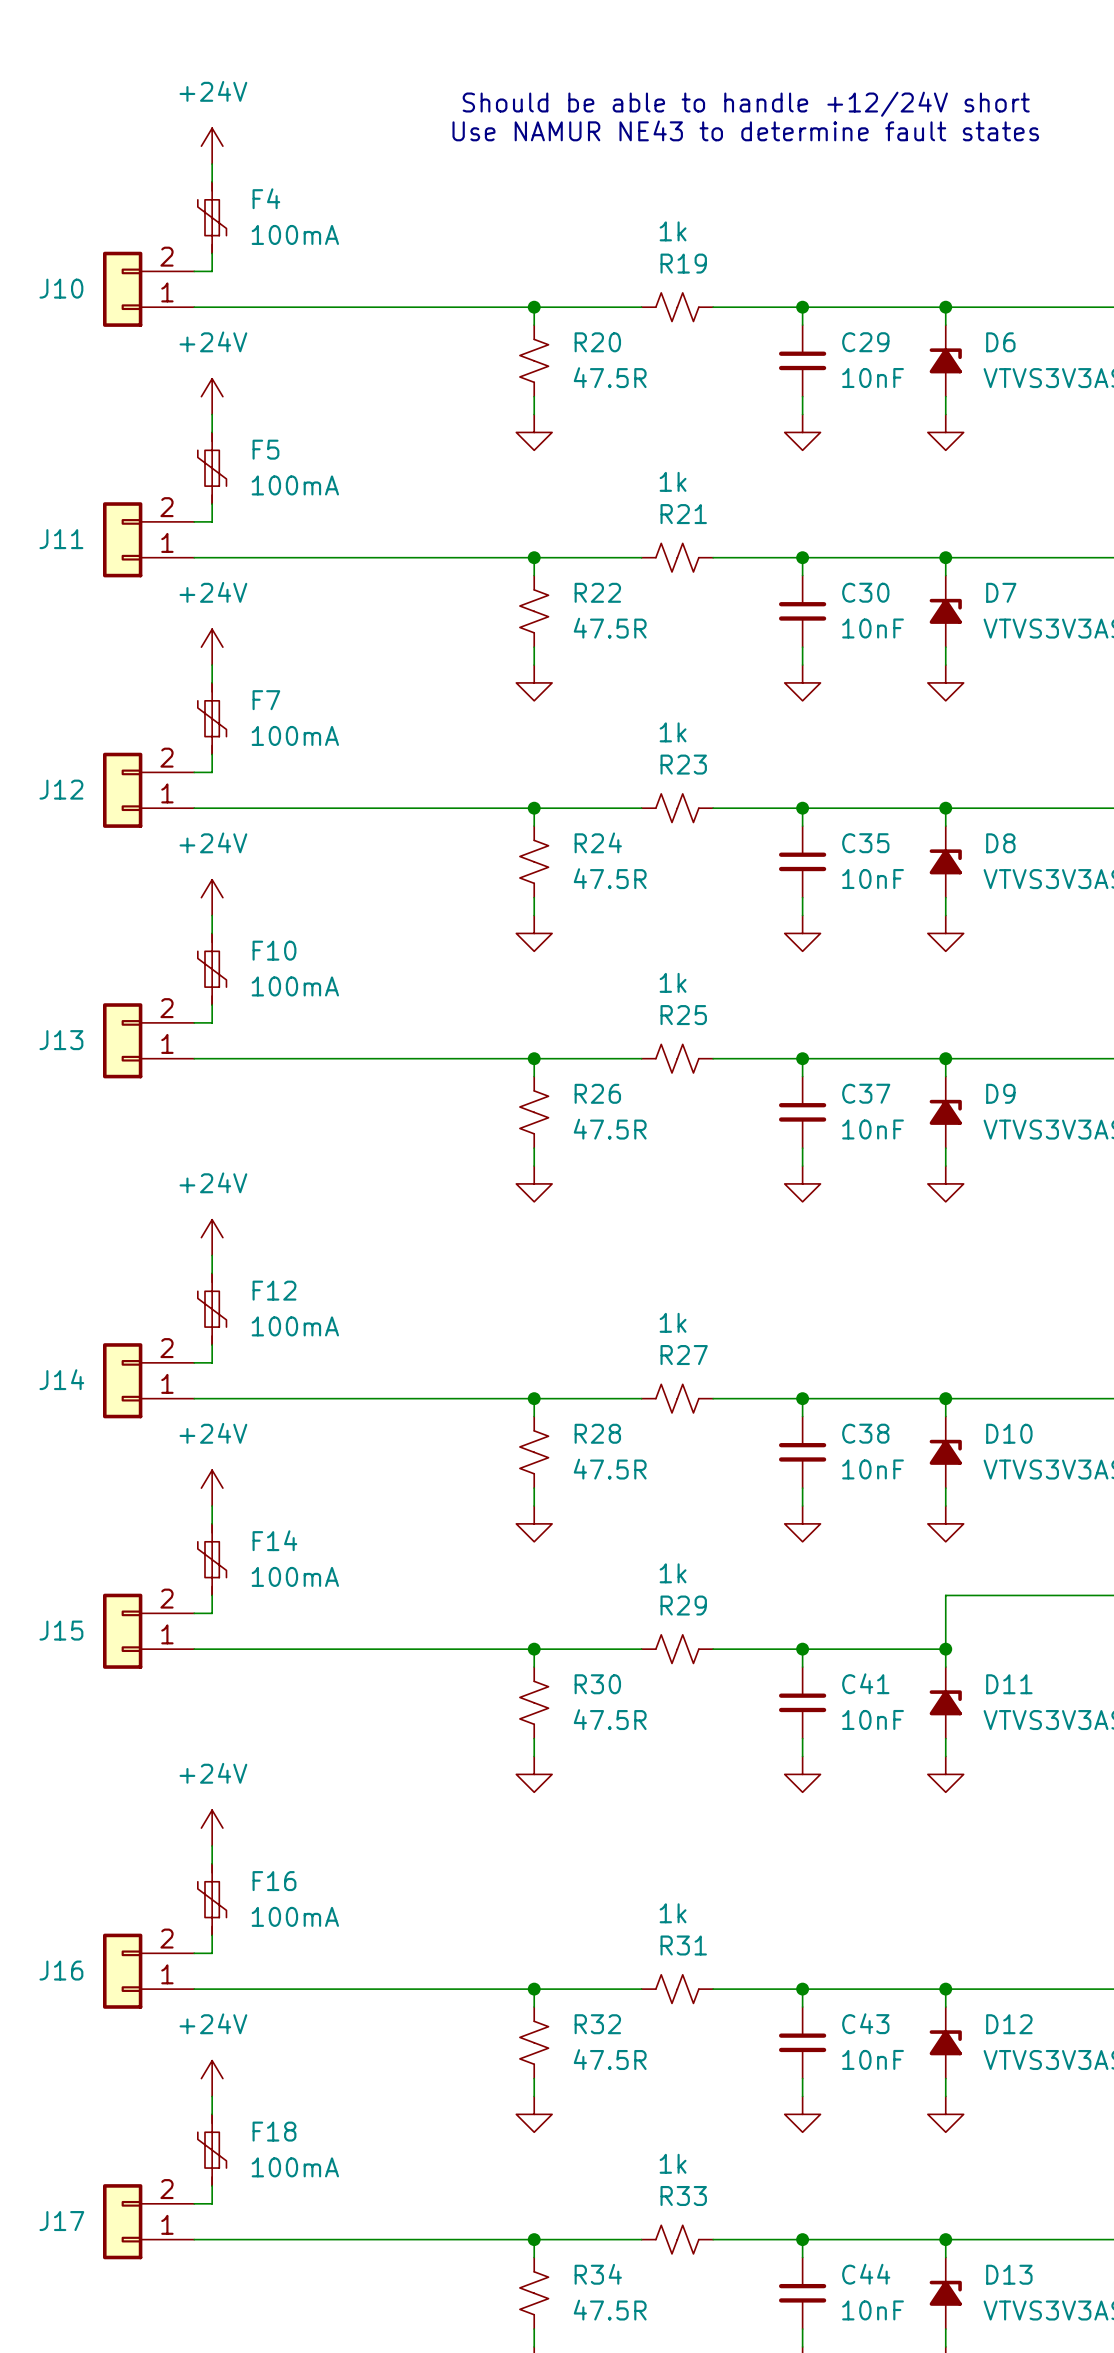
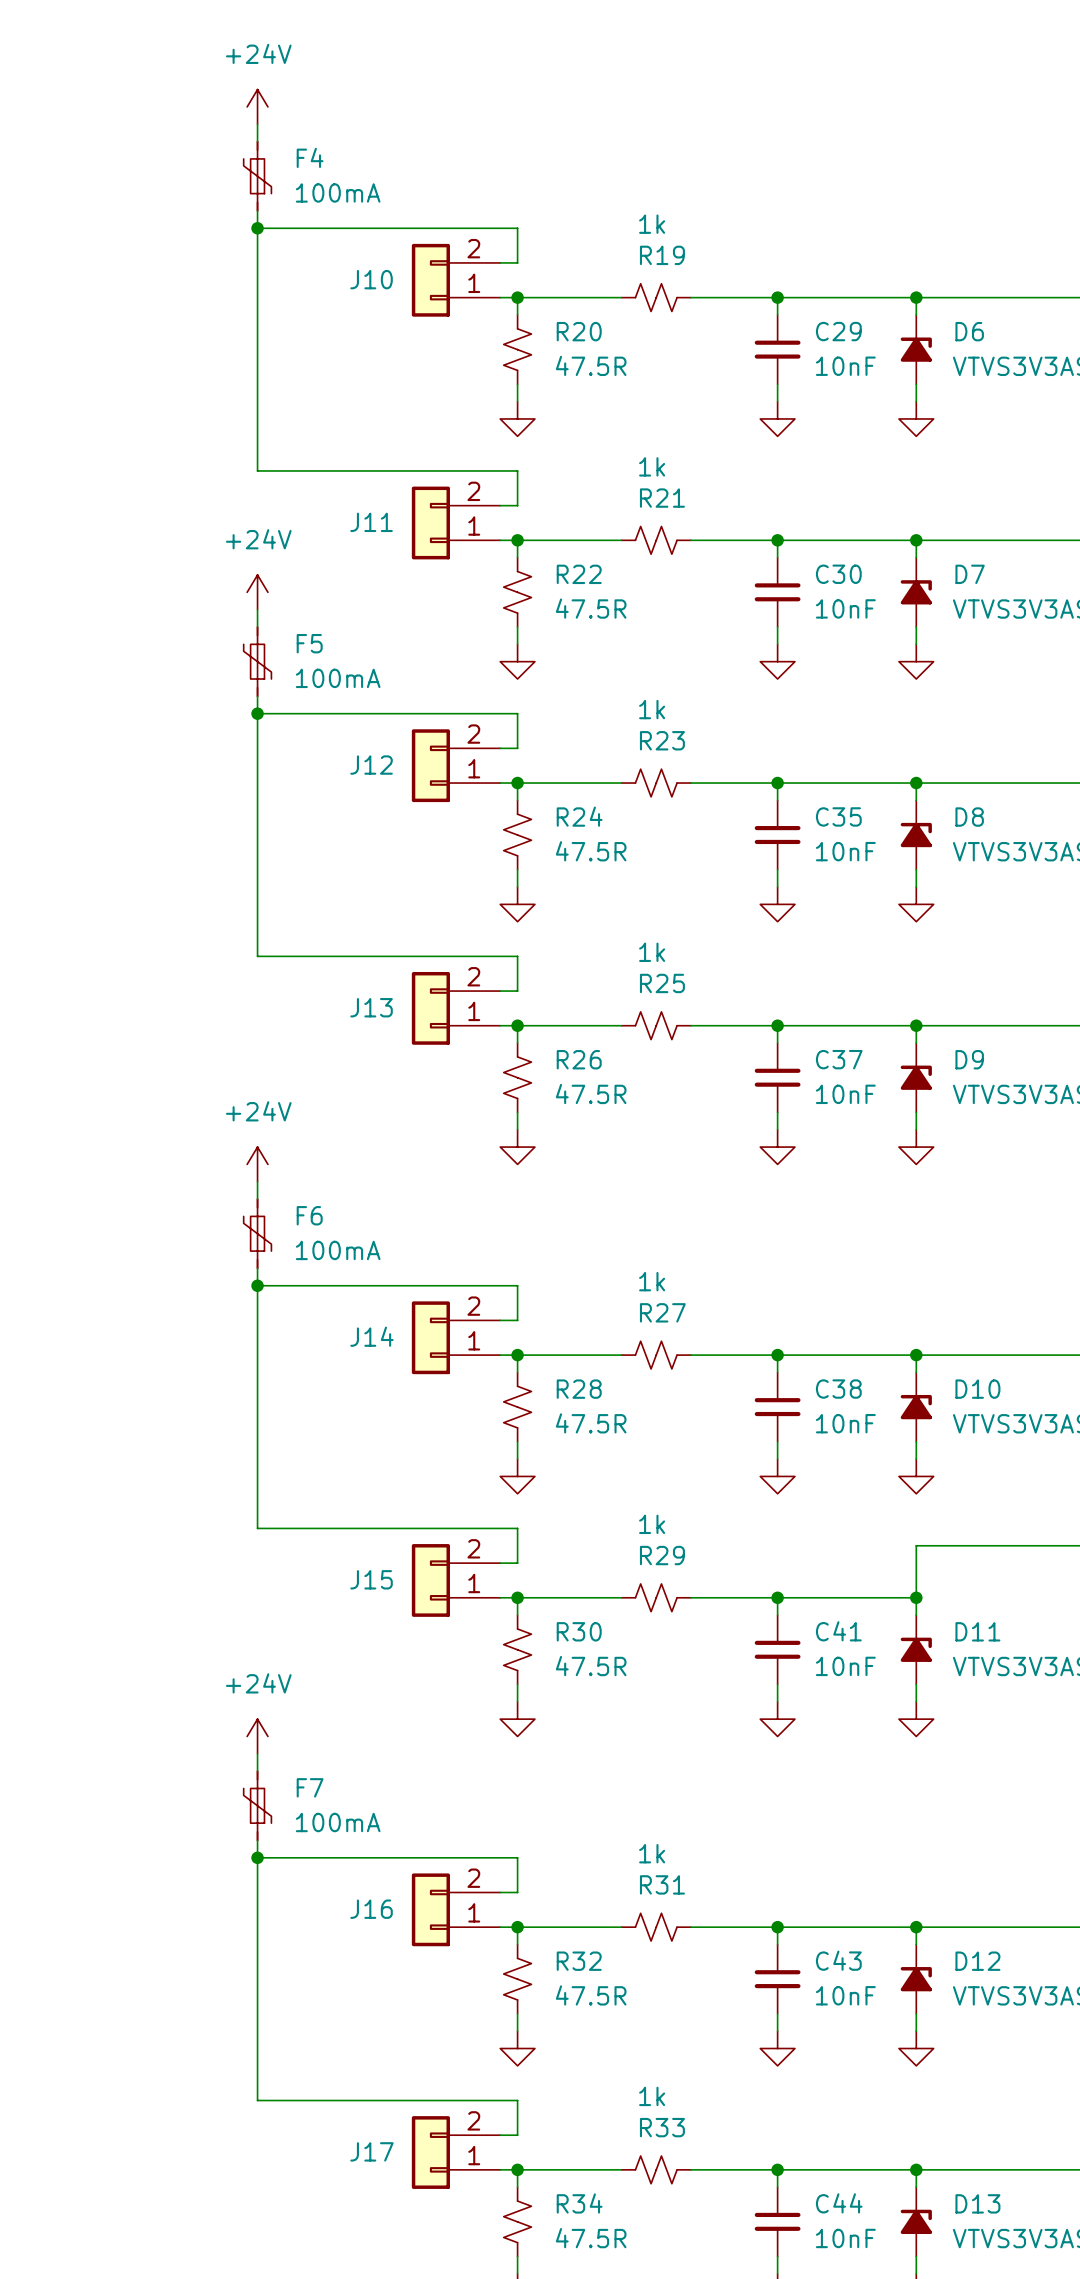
text: Should be able to handle +12/24V short (746, 104) -> none
text: Use NAMUR NE43 to determine fault states (745, 130) -> none
power symbol position: +24V (212, 146) -> +24V (257, 106)
wire: (212, 164) (212, 181) -> (257, 124) (257, 141)
F4 position: (212, 217) -> (257, 176)
wire: none -> (257, 210) (257, 470) (517, 470) (517, 505) (500, 505)
wire: none -> (257, 228) (517, 228) (517, 262) (500, 262)
junction: none -> (257, 228)
wire: (212, 253) (212, 271) (194, 271) -> none
J10 position: (148, 289) -> (456, 280)
wire: (194, 307) (516, 307) -> none
power symbol: +24V (212, 396) -> none
wire: (212, 414) (212, 432) -> none
F5 position: (212, 468) -> (257, 661)
wire: (212, 504) (212, 521) (194, 521) -> none
J11 position: (148, 539) -> (456, 522)
wire: (194, 557) (516, 557) -> none
power symbol position: +24V (212, 647) -> +24V (257, 592)
wire: (212, 665) (212, 682) -> (257, 609) (257, 627)
F7 position: (212, 718) -> (257, 1805)
wire: none -> (257, 696) (257, 956) (517, 956) (517, 991) (500, 991)
wire: none -> (257, 713) (517, 713) (517, 748) (500, 748)
junction: none -> (257, 713)
wire: (212, 754) (212, 772) (194, 772) -> none
J12 position: (148, 790) -> (456, 765)
wire: (194, 808) (516, 808) -> none
power symbol: +24V (212, 897) -> none
wire: (212, 915) (212, 933) -> none
F10: 100mA (212, 969) -> none
wire: (212, 1005) (212, 1022) (194, 1022) -> none
J13 position: (148, 1040) -> (456, 1008)
wire: (194, 1058) (516, 1058) -> none
power symbol position: +24V (212, 1237) -> +24V (257, 1164)
wire: (212, 1255) (212, 1273) -> (257, 1181) (257, 1199)
F6: none -> 100mA (257, 1233)
F12: 100mA (212, 1309) -> none
wire: none -> (257, 1268) (257, 1528) (517, 1528) (517, 1563) (500, 1563)
wire: none -> (257, 1285) (517, 1285) (517, 1320) (500, 1320)
junction: none -> (257, 1285)
wire: (212, 1344) (212, 1362) (194, 1362) -> none
J14 position: (148, 1380) -> (456, 1337)
wire: (194, 1398) (516, 1398) -> none
power symbol: +24V (212, 1488) -> none
wire: (212, 1506) (212, 1523) -> none
F14: 100mA (212, 1559) -> none
wire: (212, 1595) (212, 1613) (194, 1613) -> none
J15 position: (148, 1631) -> (456, 1580)
wire: (194, 1649) (516, 1649) -> none
power symbol position: +24V (212, 1828) -> +24V (257, 1736)
wire: (212, 1845) (212, 1863) -> (257, 1753) (257, 1771)
F16: 100mA (212, 1899) -> none
wire: none -> (257, 1840) (257, 2100) (517, 2100) (517, 2135) (500, 2135)
wire: none -> (257, 1857) (517, 1857) (517, 1892) (500, 1892)
junction: none -> (257, 1857)
wire: (212, 1935) (212, 1953) (194, 1953) -> none
J16 position: (148, 1971) -> (456, 1909)
wire: (194, 1989) (516, 1989) -> none
power symbol: +24V (212, 2078) -> none
wire: (212, 2096) (212, 2114) -> none
F18: 100mA (212, 2150) -> none
wire: (212, 2185) (212, 2203) (194, 2203) -> none
J17 position: (148, 2221) -> (456, 2152)
wire: (194, 2239) (516, 2239) -> none

